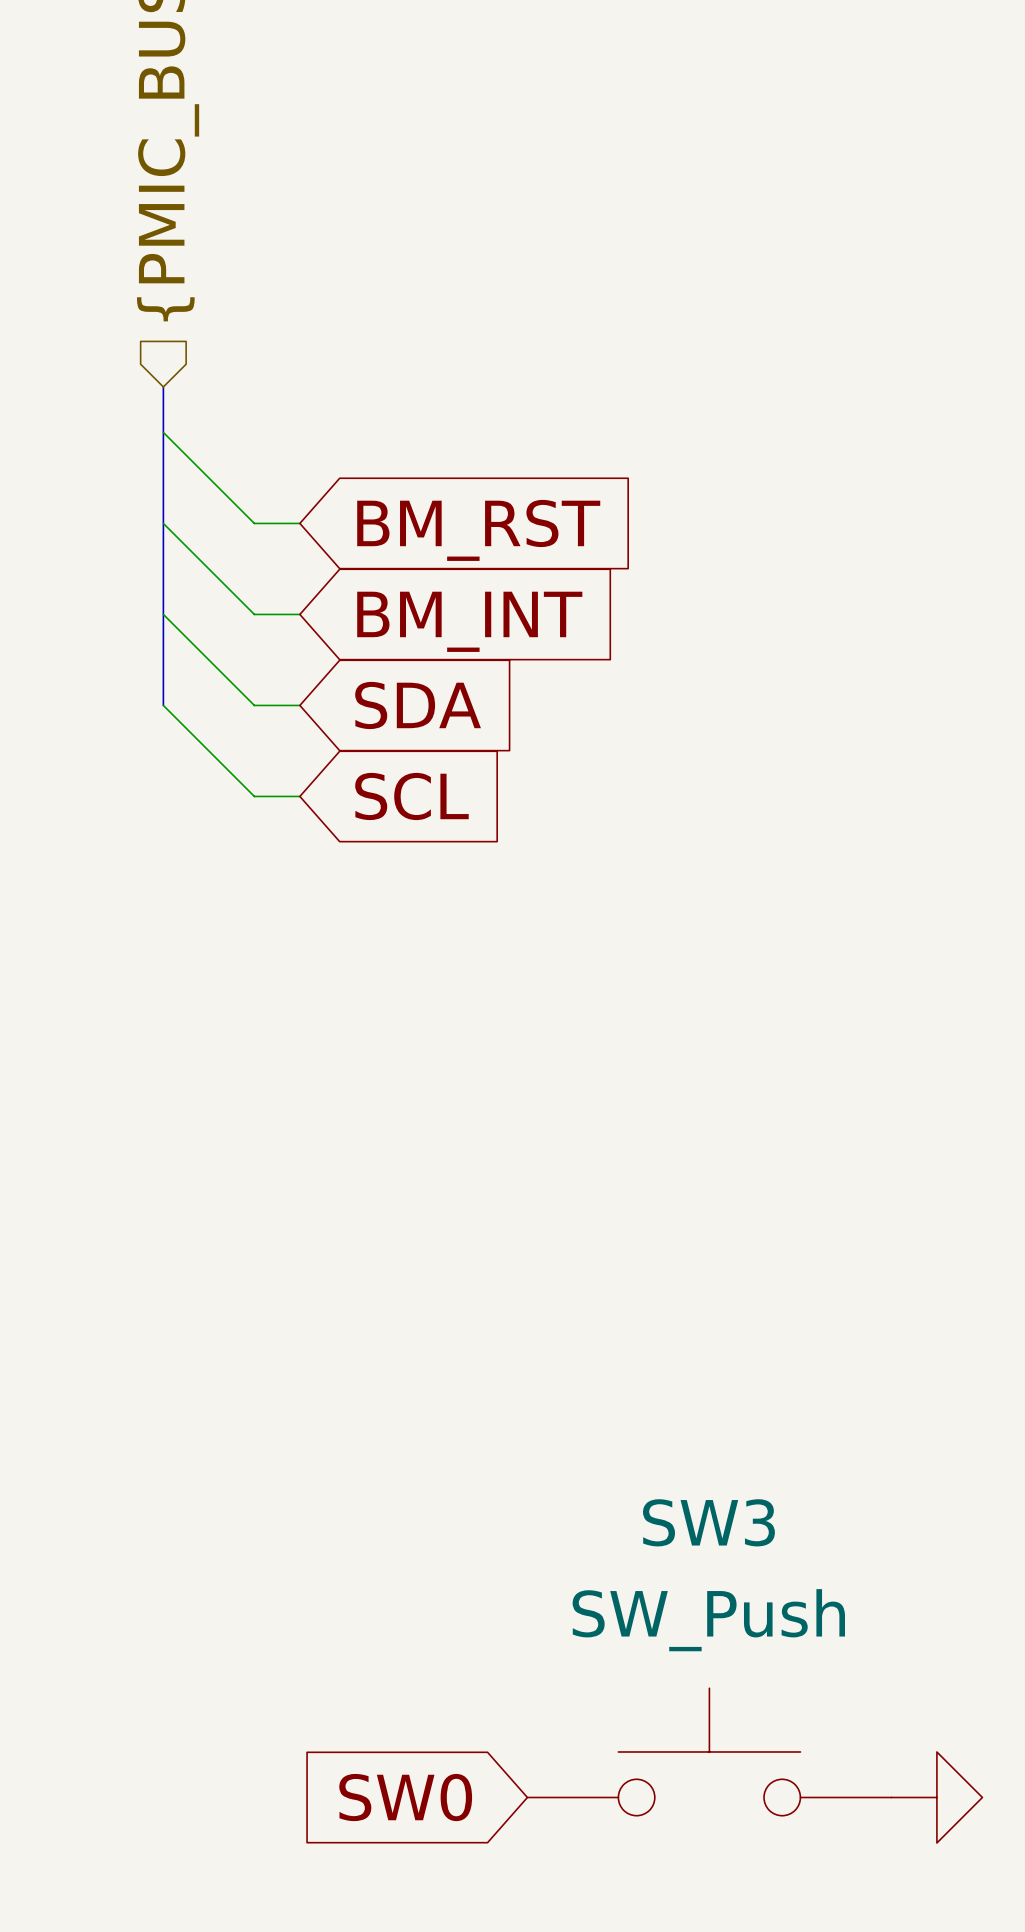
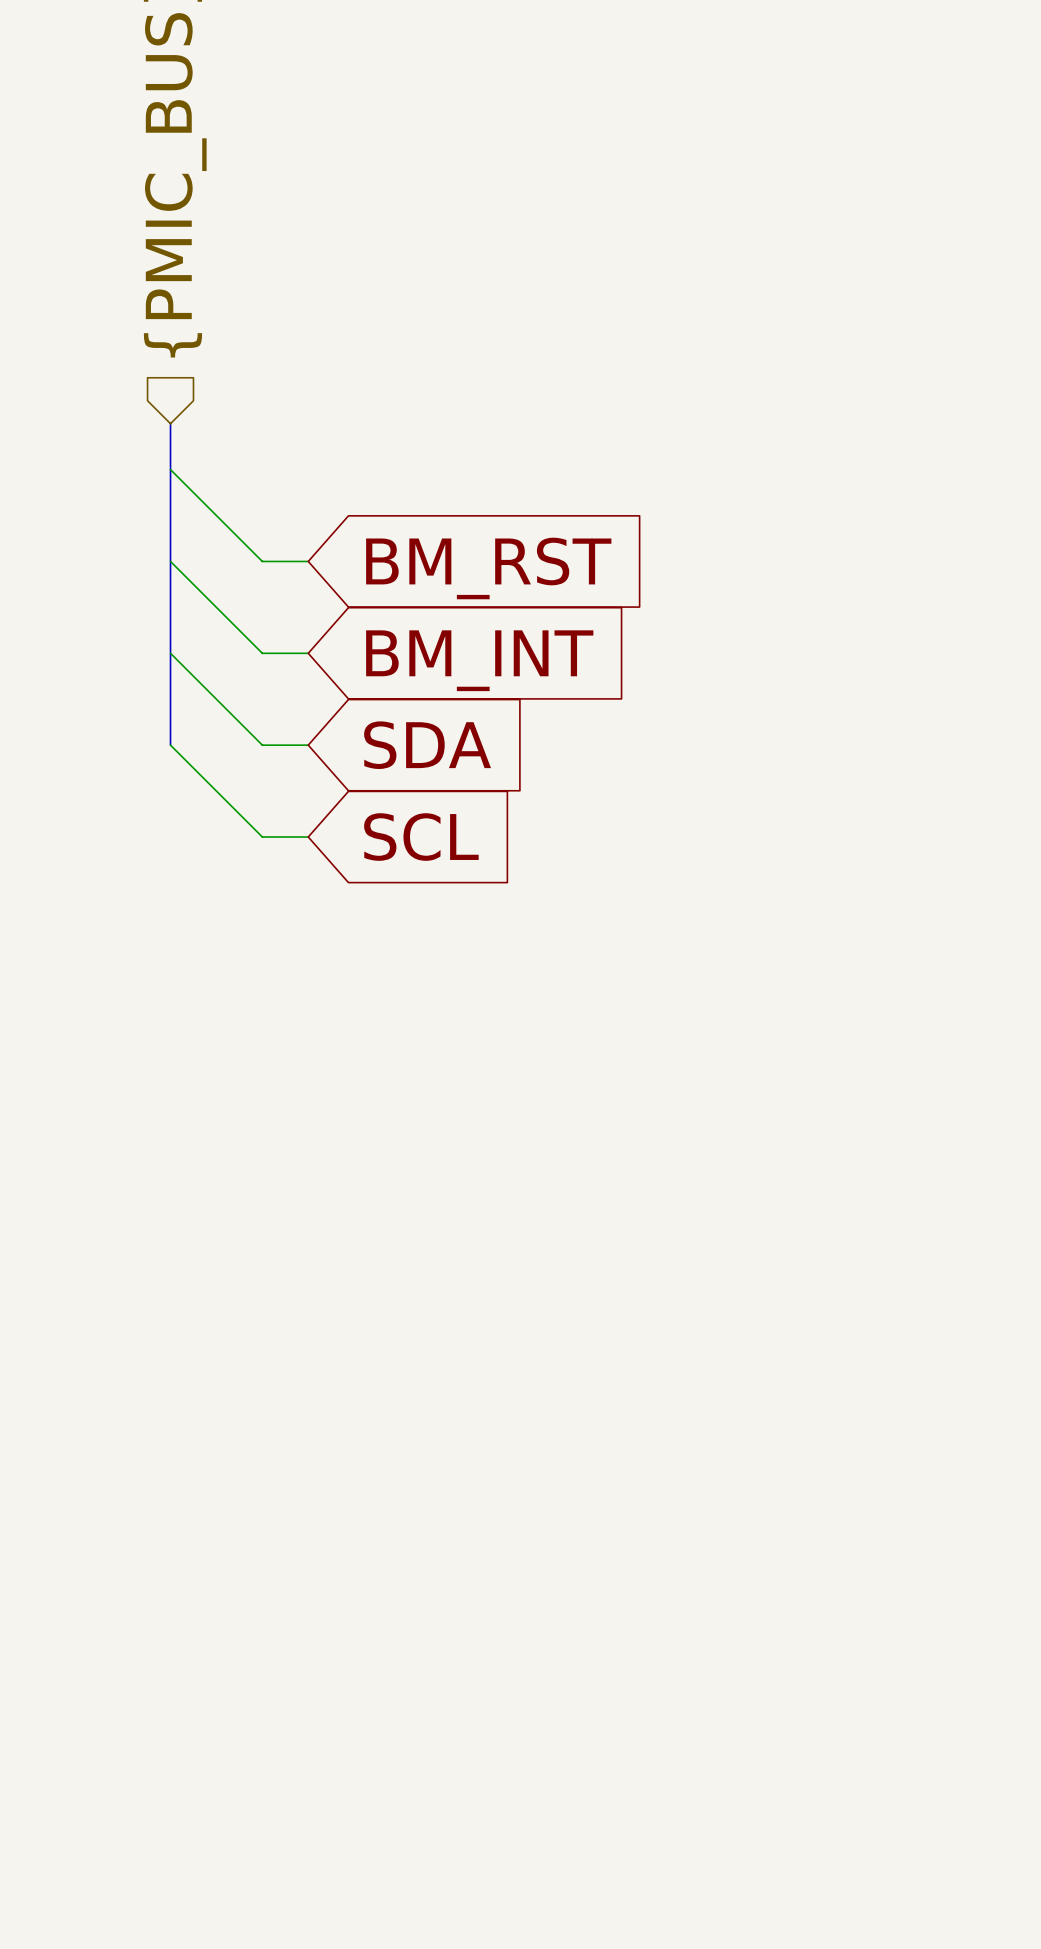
SW3: SW_Push (709, 1751) -> none
global label: SW0 (405, 1797) -> none
power symbol: (936, 1797) -> none

